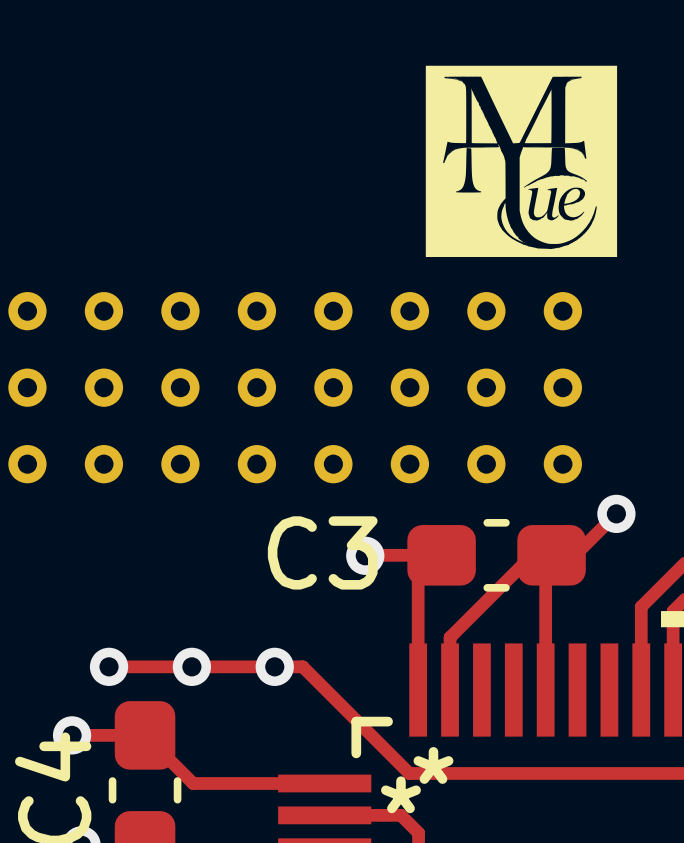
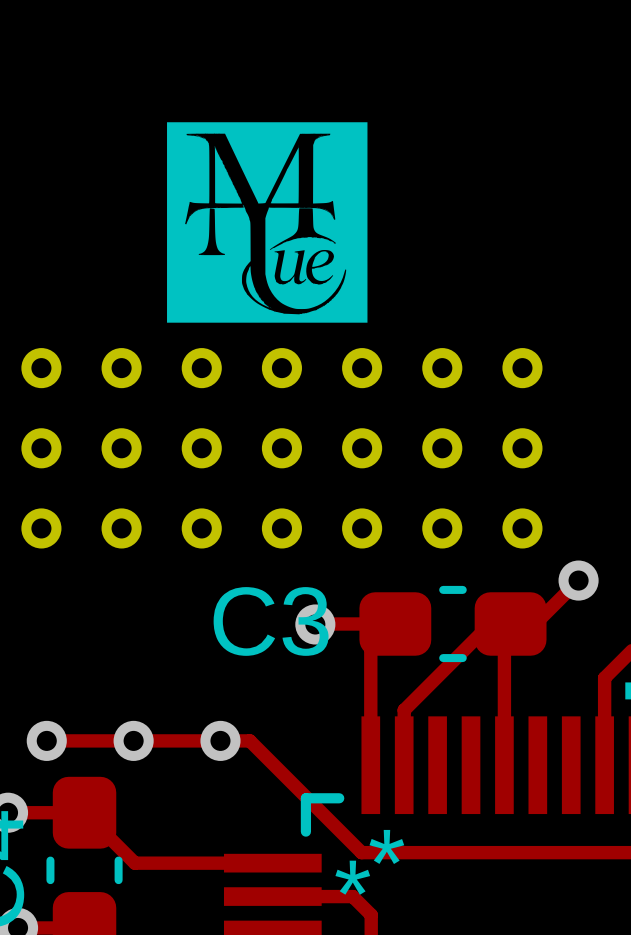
drawing position: (521, 161) -> (267, 222)

